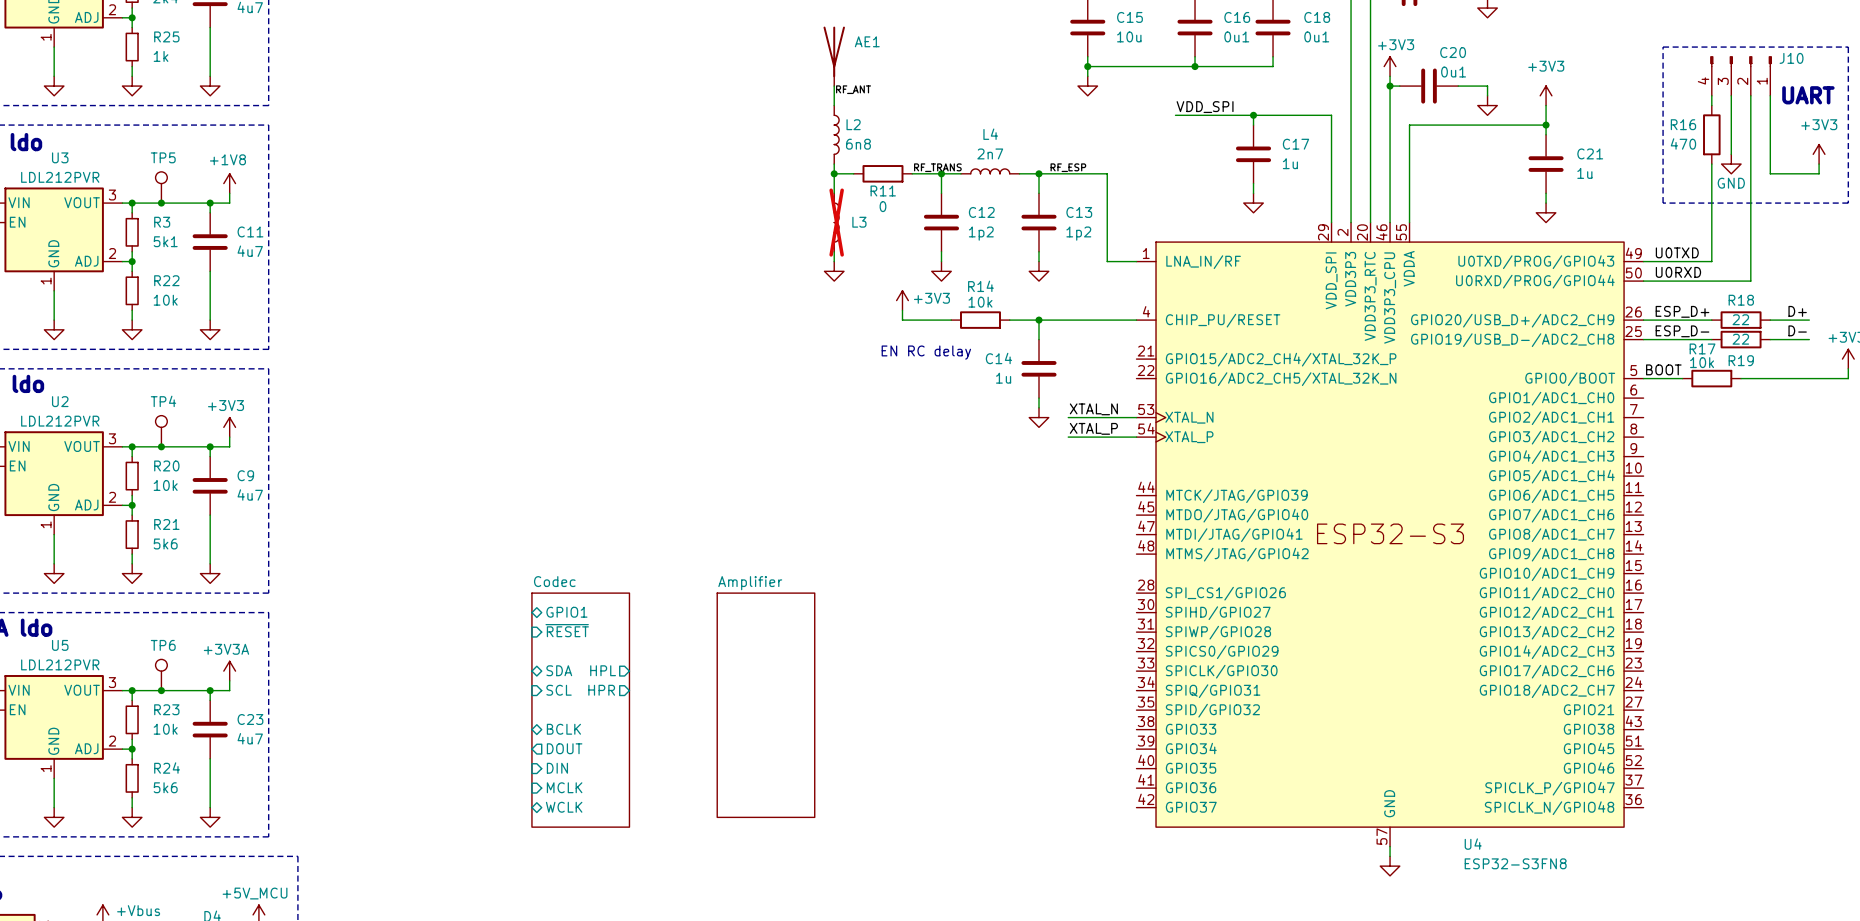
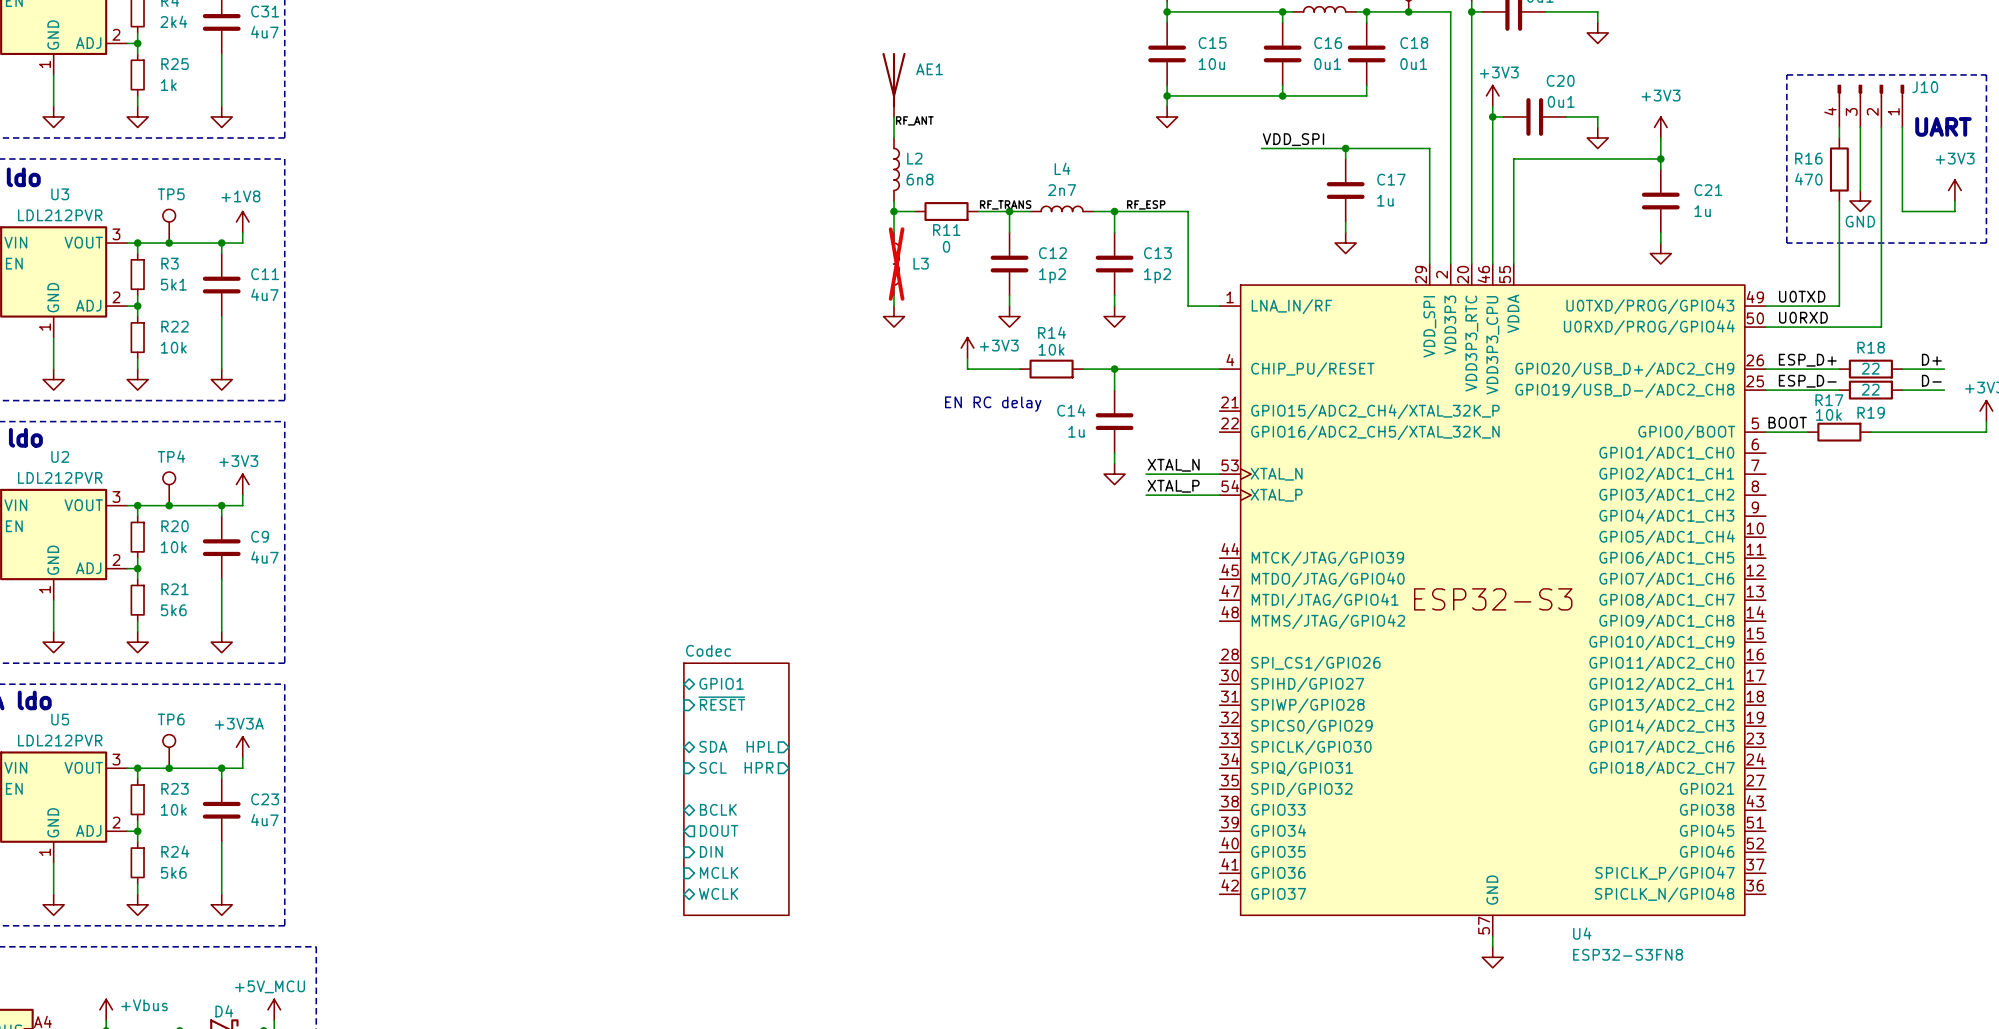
sheet pin position: GPIO1 (566, 612) -> GPIO1 (721, 683)
sheet pin position: ~{RESET} (567, 630) -> ~{RESET} (721, 703)
sheet pin position: SDA (559, 670) -> SDA (713, 746)
sheet pin position: HPL (603, 670) -> HPL (760, 746)
sheet pin position: SCL (559, 690) -> SCL (713, 767)
sheet pin position: HPR (601, 690) -> HPR (759, 767)
sheet Amplifier: (765, 705) -> none
sheet Codec position: (580, 710) -> (736, 789)
sheet pin position: BCLK (563, 729) -> BCLK (718, 809)
sheet pin position: DOUT (564, 748) -> DOUT (719, 830)
sheet pin position: DIN (557, 768) -> DIN (711, 851)
sheet pin position: MCLK (564, 787) -> MCLK (719, 872)
sheet pin position: WCLK (564, 807) -> WCLK (718, 893)

